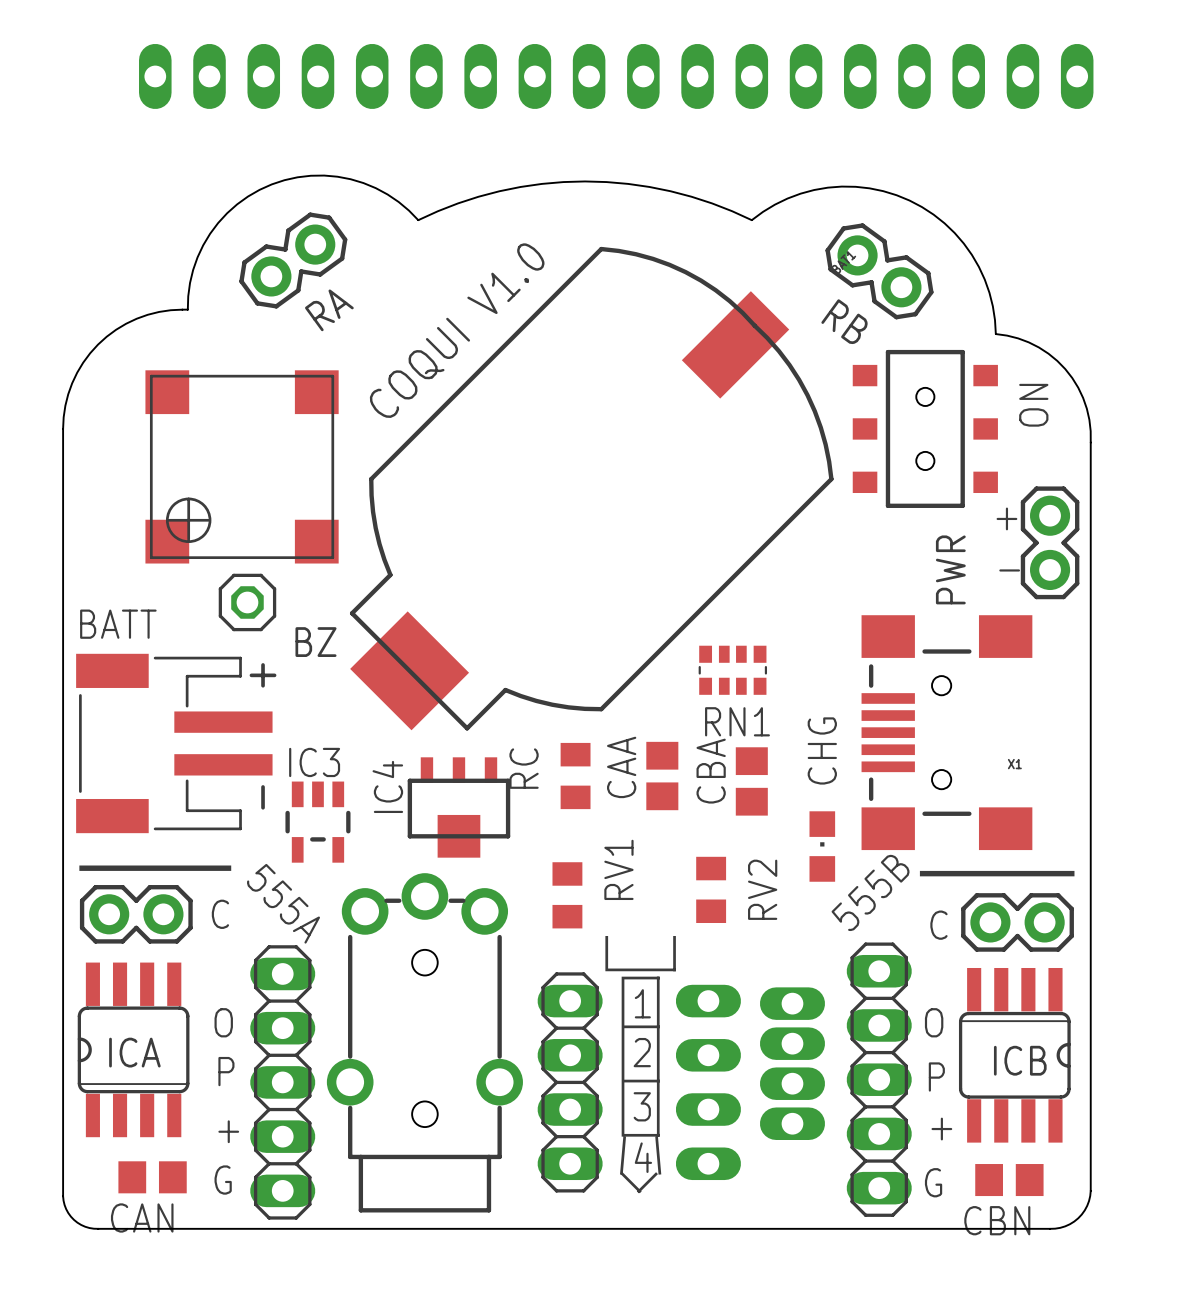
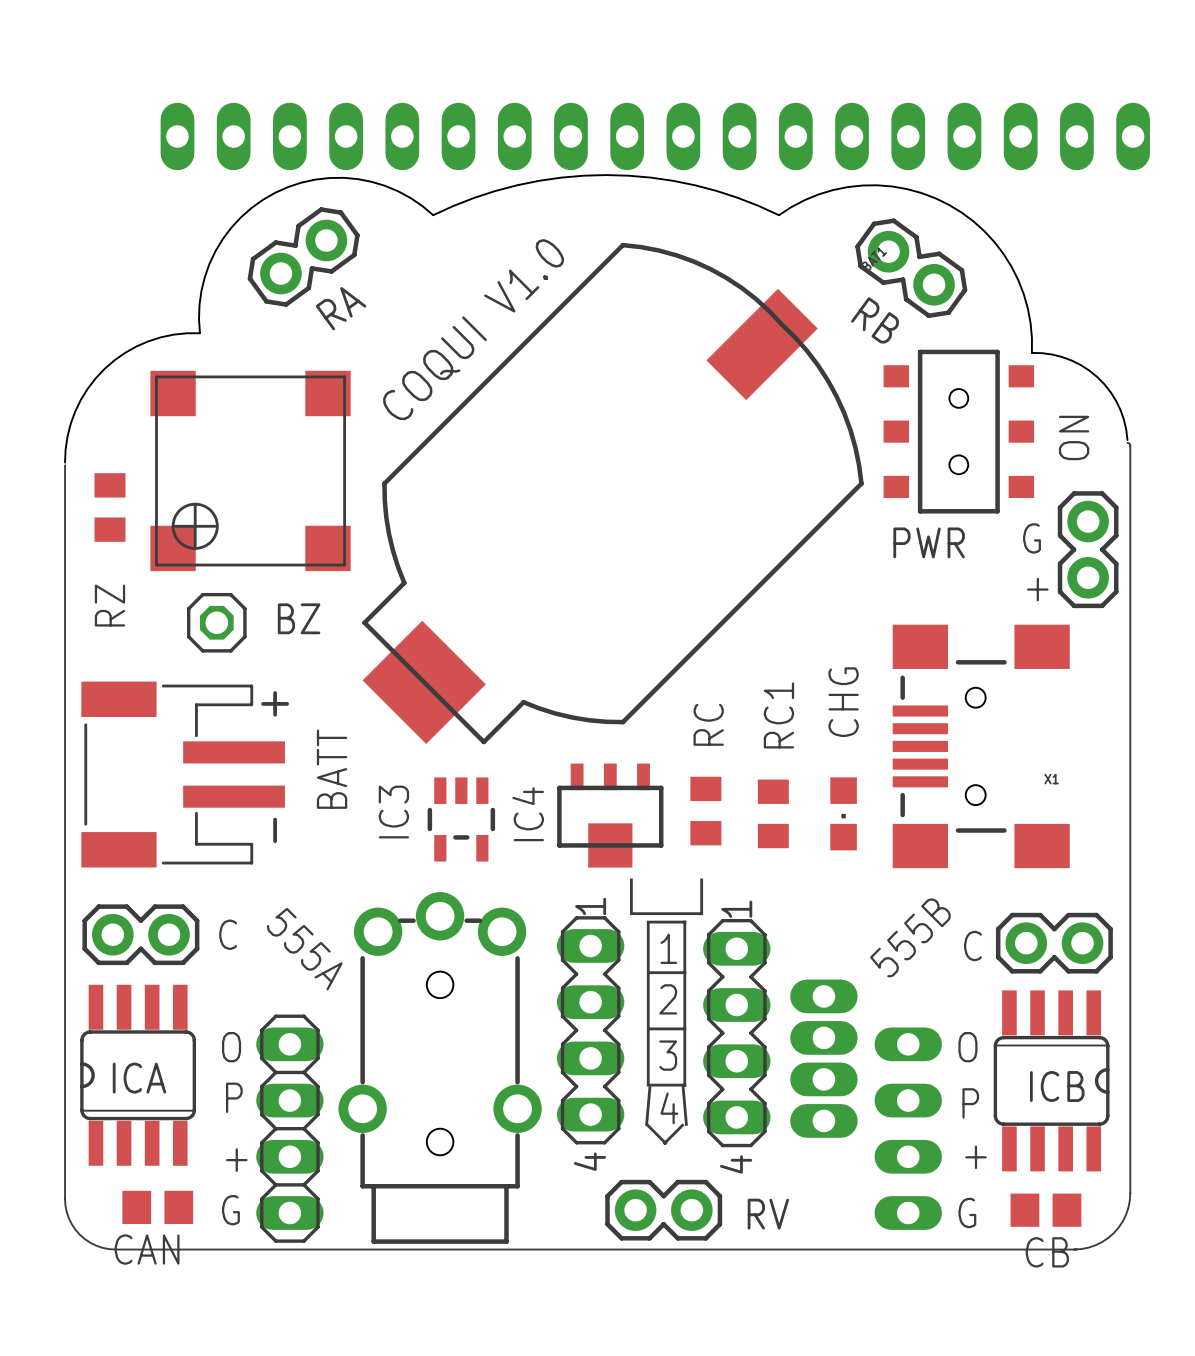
part position: (616, 76) -> (655, 136)
board edge: (418, 220) (387, 194) (350, 179) (324, 175) (297, 177) (259, 189) (227, 213) (203, 245) (190, 283) (187, 309) (170, 310) (147, 314) (116, 329) (98, 344) (83, 362) (68, 394) (63, 428) (63, 1196) (66, 1209) (70, 1216) (85, 1226) (98, 1228) (1050, 1228) (1069, 1224) (1084, 1210) (1090, 1190) (1090, 431) (1086, 408) (1072, 378) (1057, 360) (1028, 342) (995, 334) (989, 292) (978, 266) (954, 232) (921, 207) (883, 191) (855, 186) (827, 187) (787, 198) (751, 220) -> (1127, 440) (1120, 410) (1110, 392) (1097, 377) (1071, 360) (1052, 354) (1031, 352) (1030, 323) (1018, 280) (994, 242) (961, 212) (935, 198) (906, 189) (862, 185) (818, 194) (778, 215)
board edge: none -> (433, 215) (398, 191) (371, 181) (343, 177) (301, 182) (263, 199) (231, 227) (209, 263) (201, 290) (199, 333) (173, 334) (148, 341) (125, 352) (104, 368) (87, 388) (75, 411) (67, 436) (65, 462)
text position: ON (1033, 405) -> ON (1074, 437)
line: none -> (1127, 442) (1130, 445) (1129, 1200) (1126, 1214) (1113, 1233) (1095, 1245) (1074, 1249)
line: none -> (65, 465) (65, 1198) (68, 1218) (75, 1229) (84, 1239) (96, 1245) (115, 1249) (1076, 1249)
RZ: none -> (110, 507)
text position: + (1006, 518) -> + (1037, 589)
text: none -> G (1031, 538)
PWR name rotation: 0° (950, 569) -> 90° clockwise (929, 542)
text: - (1009, 570) -> none
BZ position: (247, 602) -> (216, 622)
BATT name rotation: 0° (118, 624) -> 90° counterclockwise (332, 769)
BATT name position: BATT (118, 624) -> BATT (332, 769)
BZ name position: BZ (316, 642) -> BZ (299, 618)
RN1: (732, 670) -> none
BATT position: (174, 743) -> (183, 774)
part footprint: [407, 757, 511, 858] -> [427, 777, 496, 862]
text rotation: 0° (314, 762) -> 90° counterclockwise (393, 811)
RC name position: RC (524, 768) -> RC (708, 724)
RC position: (575, 776) -> (705, 811)
CAA: (662, 776) -> none
CBA: (751, 781) -> none
text position: IC4 (387, 786) -> IC4 (528, 814)
RC1: none -> (773, 813)
part: none -> (610, 815)
part: (317, 822) -> none
CHG rotation: 0° (822, 846) -> 180° (843, 813)
CHG position: (822, 846) -> (843, 813)
drawing: none -> [629, 878, 704, 1087]
drawing: [79, 865, 232, 871] -> none
drawing: [919, 870, 1075, 877] -> none
RV2: (711, 889) -> none
text position: 555B (870, 892) -> 555B (910, 937)
RV1: (567, 895) -> none
text position: 555A (283, 903) -> 555A (304, 949)
drawing: [605, 935, 676, 1137] -> none
part footprint: [250, 945, 316, 1220] -> [256, 1014, 324, 1243]
drawing position: (641, 969) -> (667, 913)
drawing shape: [656, 976, 660, 1137] -> [649, 1083, 687, 1087]
text position: 1 (642, 1003) -> 1 (668, 948)
part: none -> (590, 1030)
part: none -> (736, 1033)
text position: 2 (642, 1052) -> 2 (668, 999)
part position: (792, 1063) -> (823, 1058)
part: (879, 1079) -> none
part: (570, 1082) -> none
part position: (708, 1082) -> (908, 1128)
text position: 3 (642, 1106) -> 3 (668, 1055)
drawing position: (623, 1155) -> (648, 1106)
drawing position: (658, 1155) -> (684, 1106)
text position: 4 (643, 1157) -> 4 (669, 1108)
RV: none -> (663, 1210)
drawing position: (631, 1182) -> (656, 1134)
drawing position: (647, 1182) -> (673, 1134)
CBN name: CBN (997, 1220) -> CB (1047, 1252)

